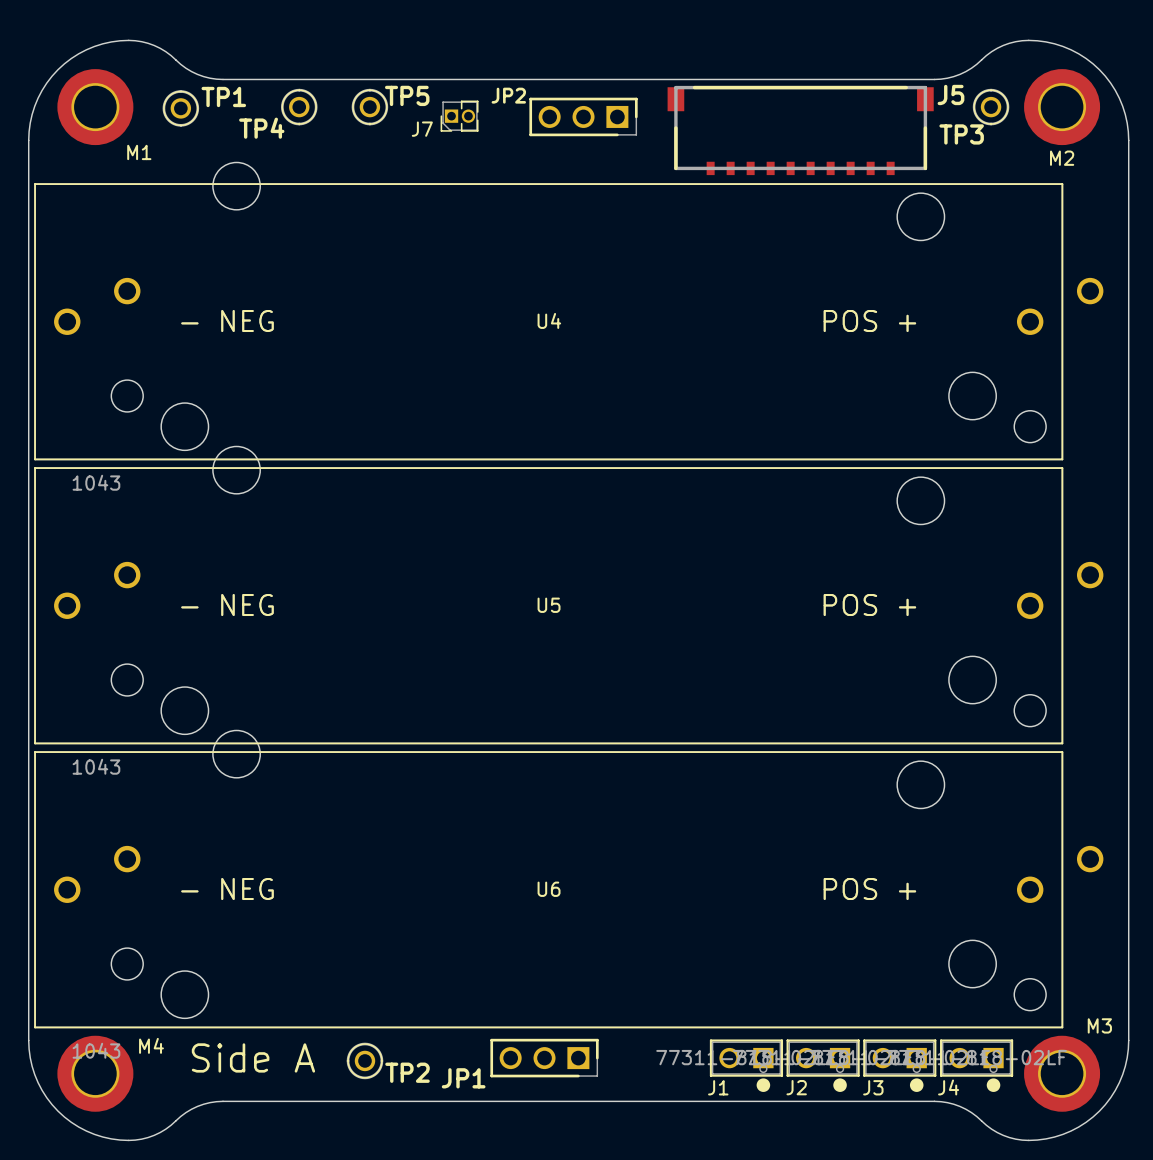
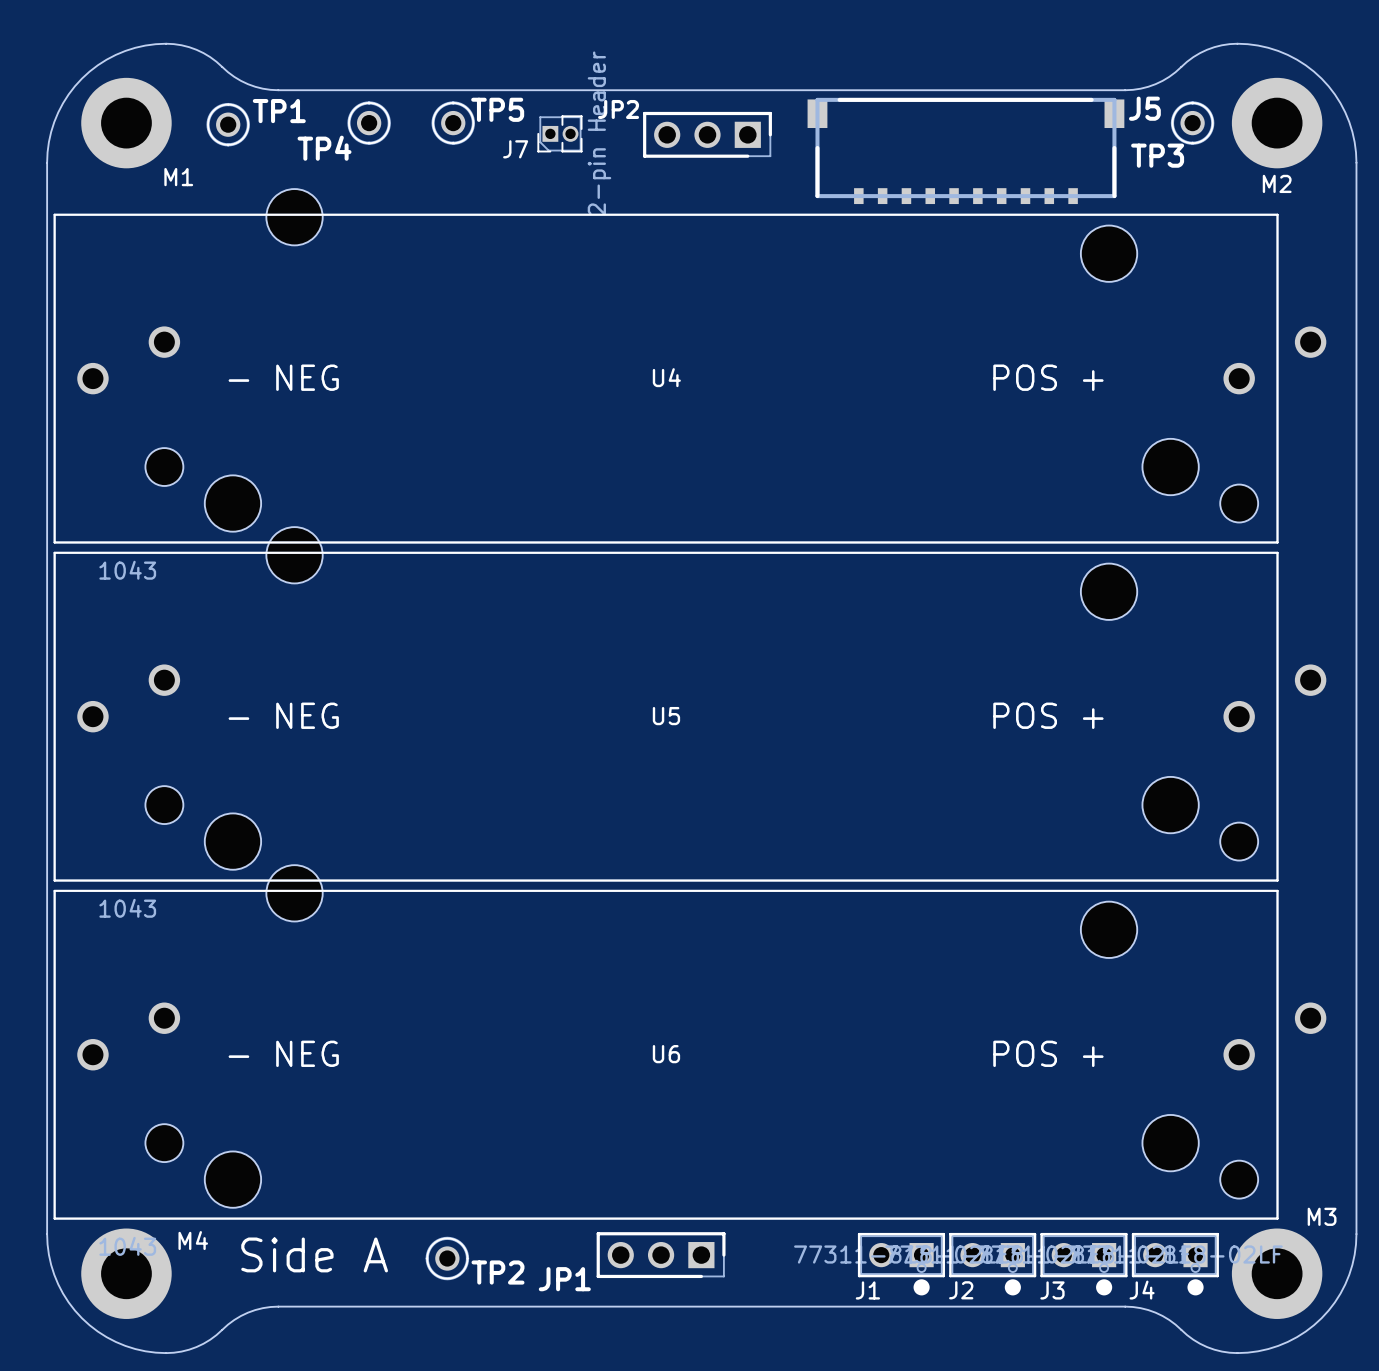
J7 value: none -> 2-pin Header (599, 133)

